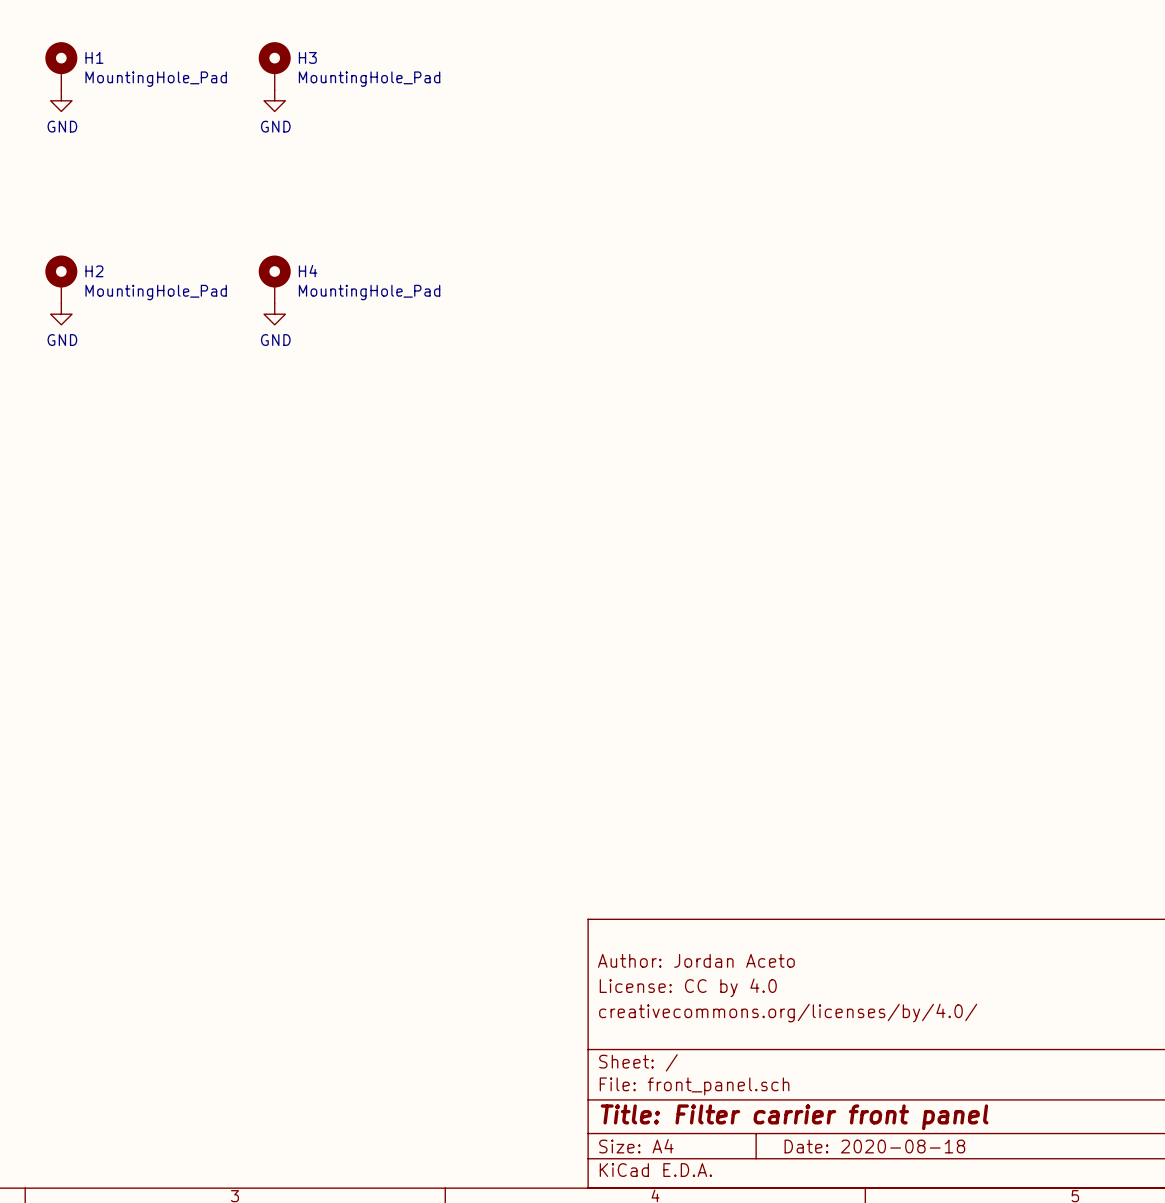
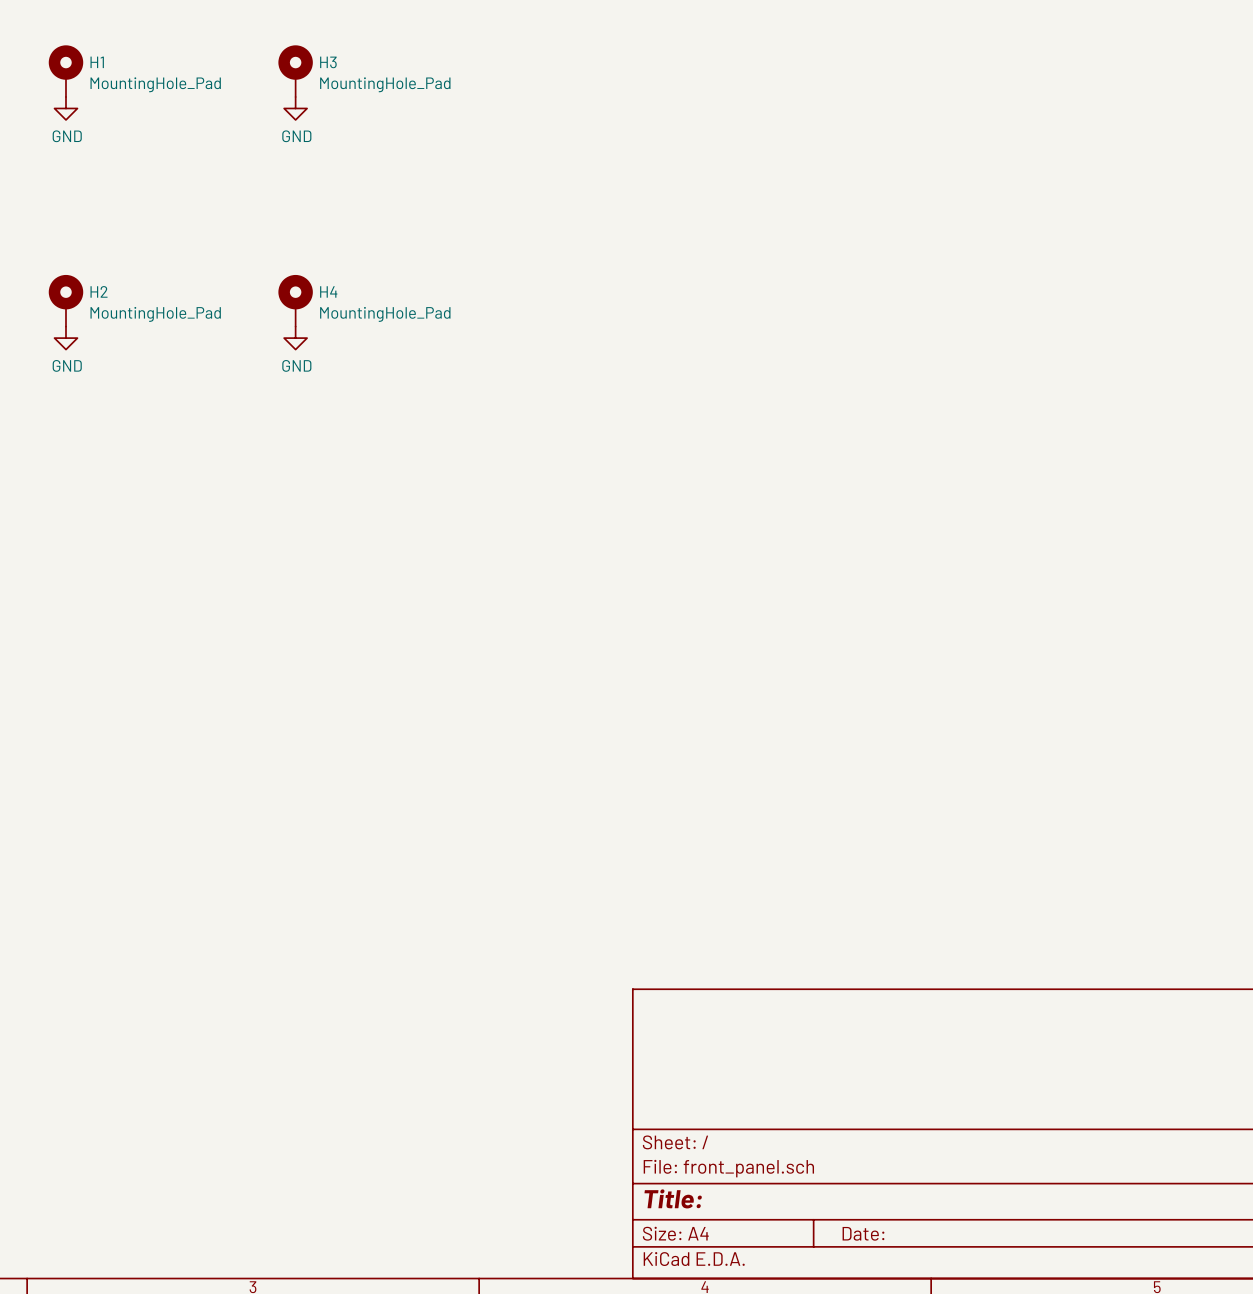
title block: Author: Jordan Aceto (696, 960) -> none
title block: License: CC by 4.0 (688, 987) -> none
title block: creativecommons.org/licenses/by/4.0/ (788, 1013) -> none
title block: Title: Filter carrier front panel (794, 1117) -> Title: (673, 1198)
title block: Date: 2020-08-18 (874, 1146) -> Date: (863, 1233)

